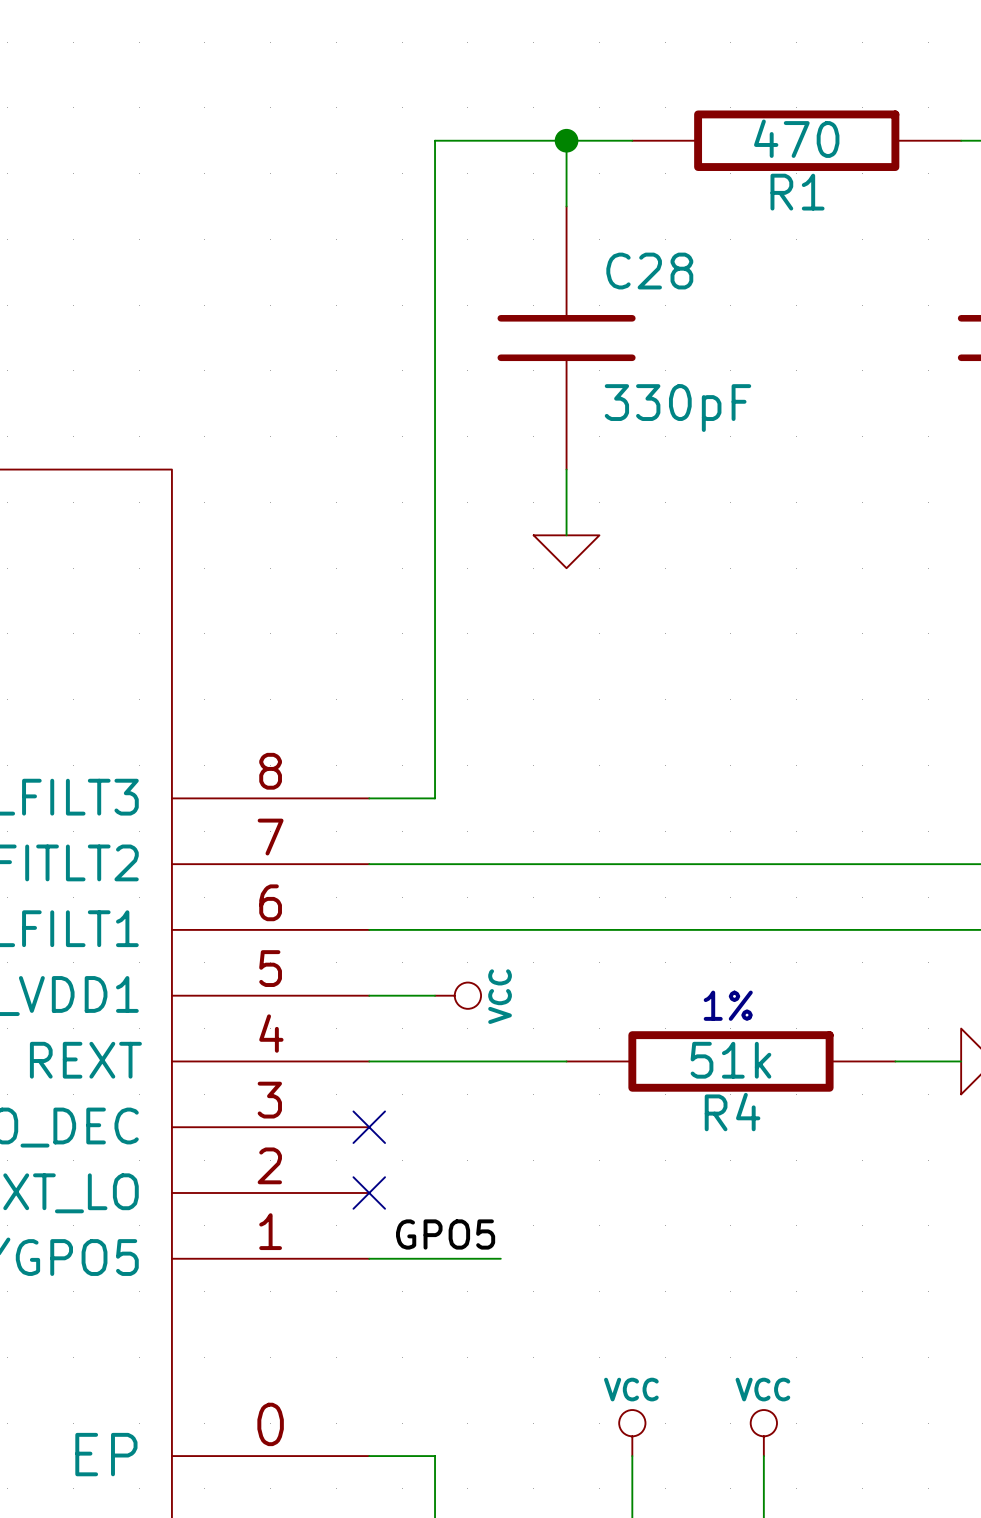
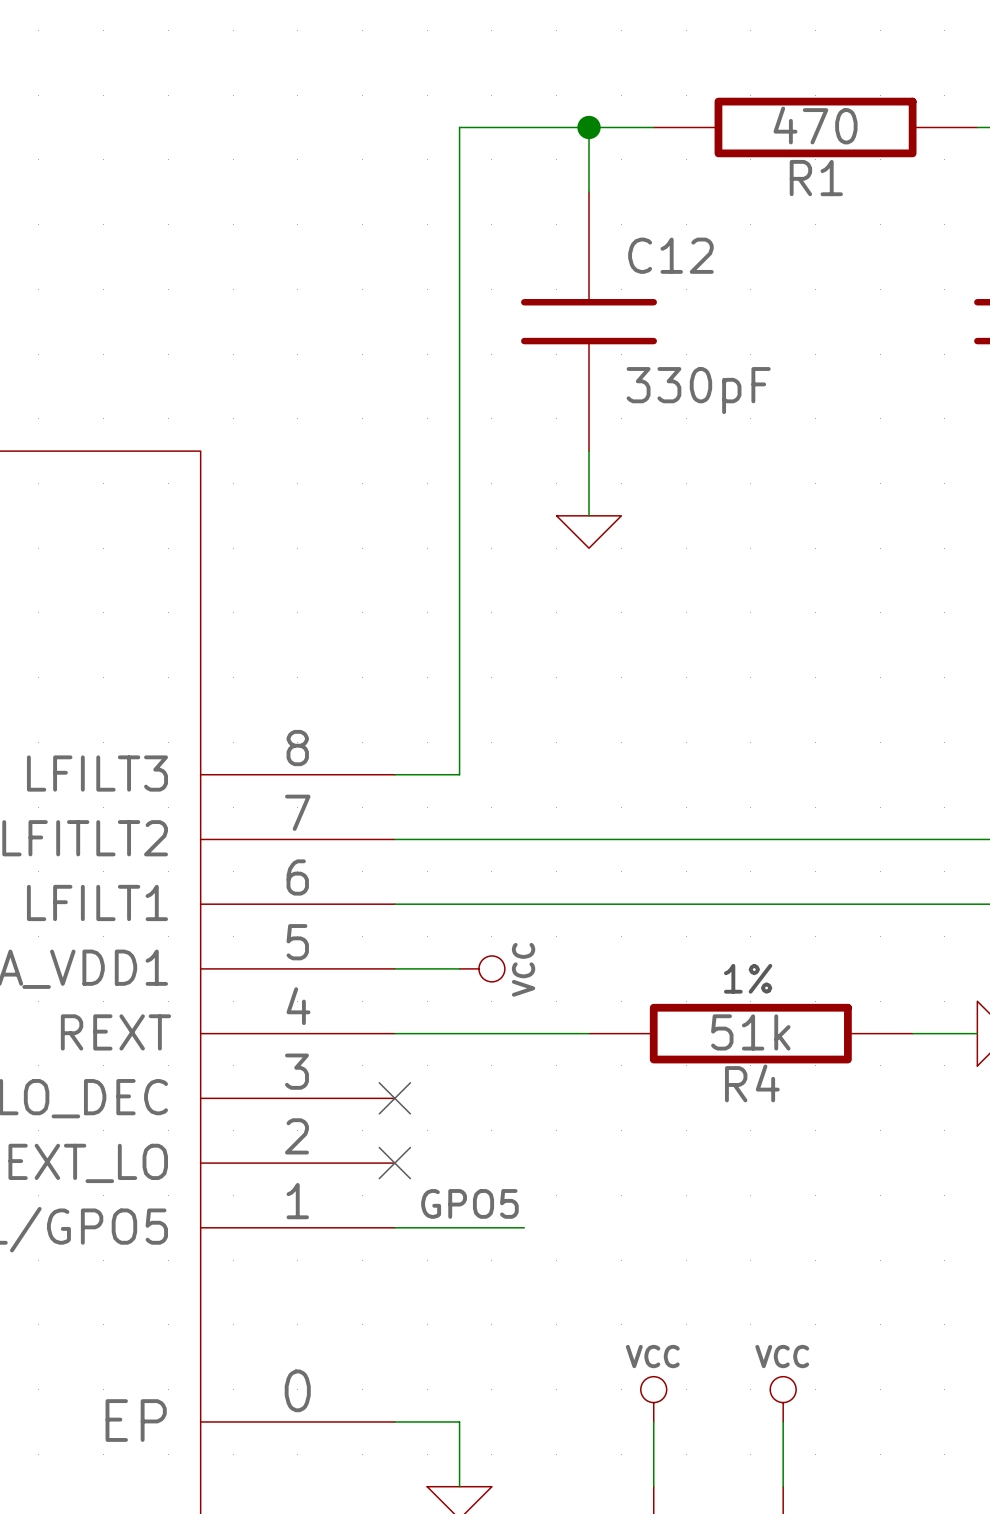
C28 name: C28 (649, 271) -> C12 (670, 255)

